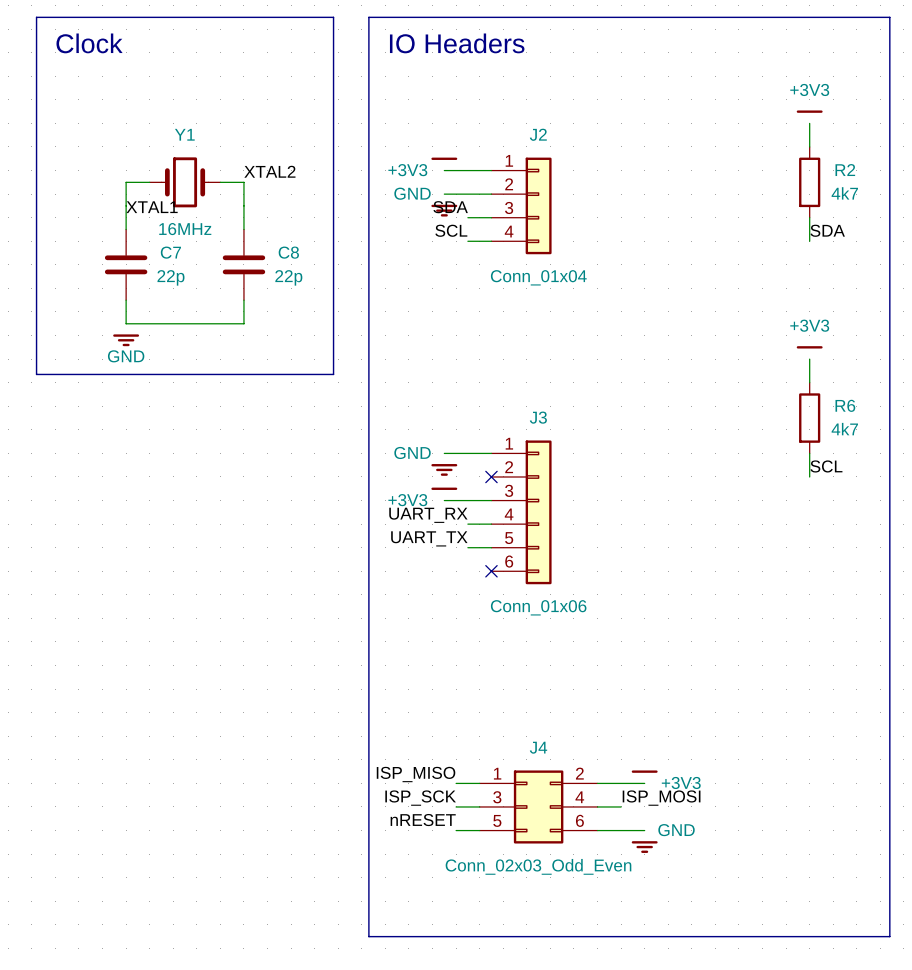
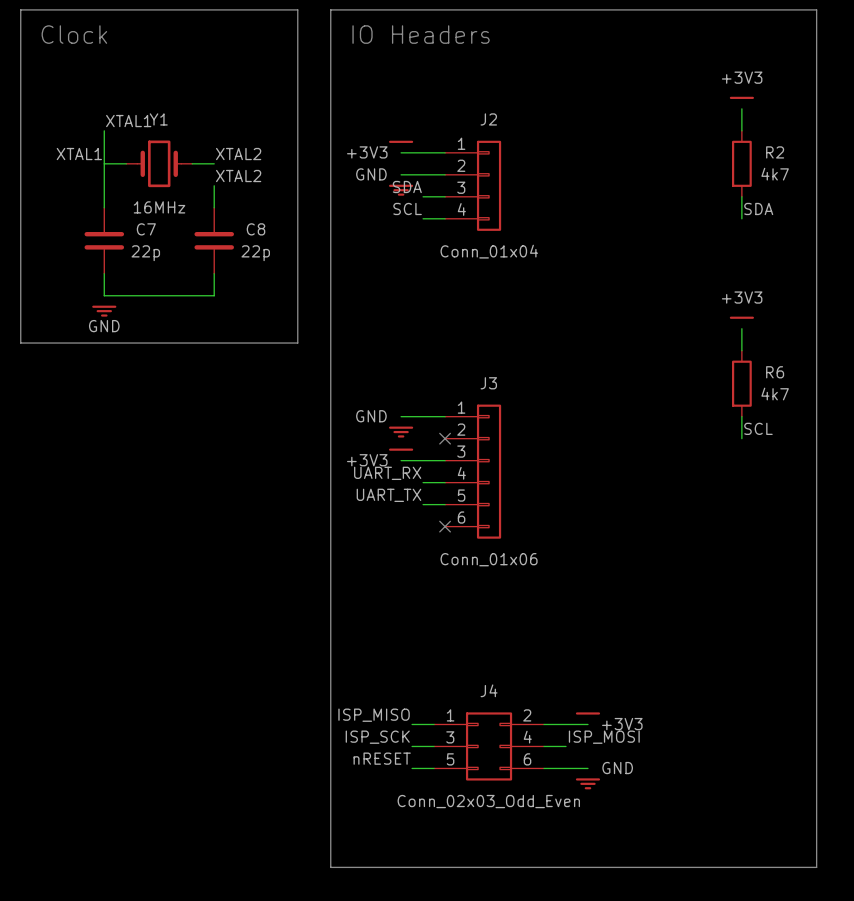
label: none -> XTAL1 (128, 121)
wire: none -> (104, 130) (104, 163)
label: none -> XTAL1 (79, 154)
wire: (243, 182) (243, 205) -> none
label: none -> XTAL2 (238, 176)
label: XTAL1 (152, 207) -> none

